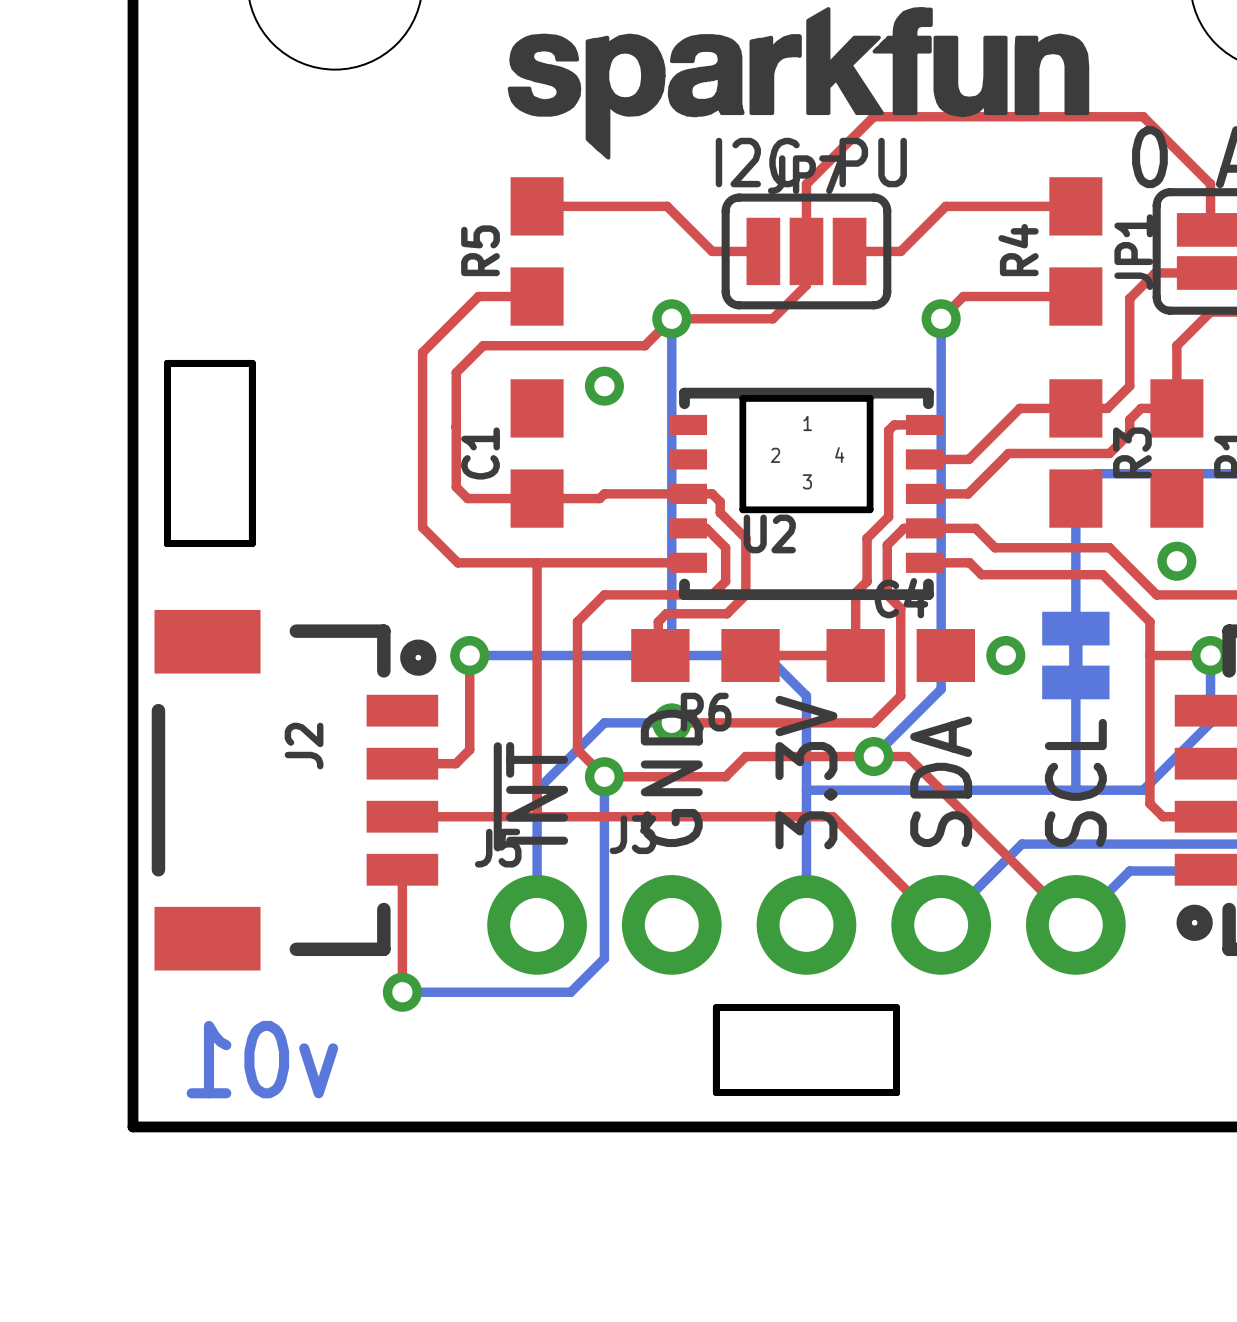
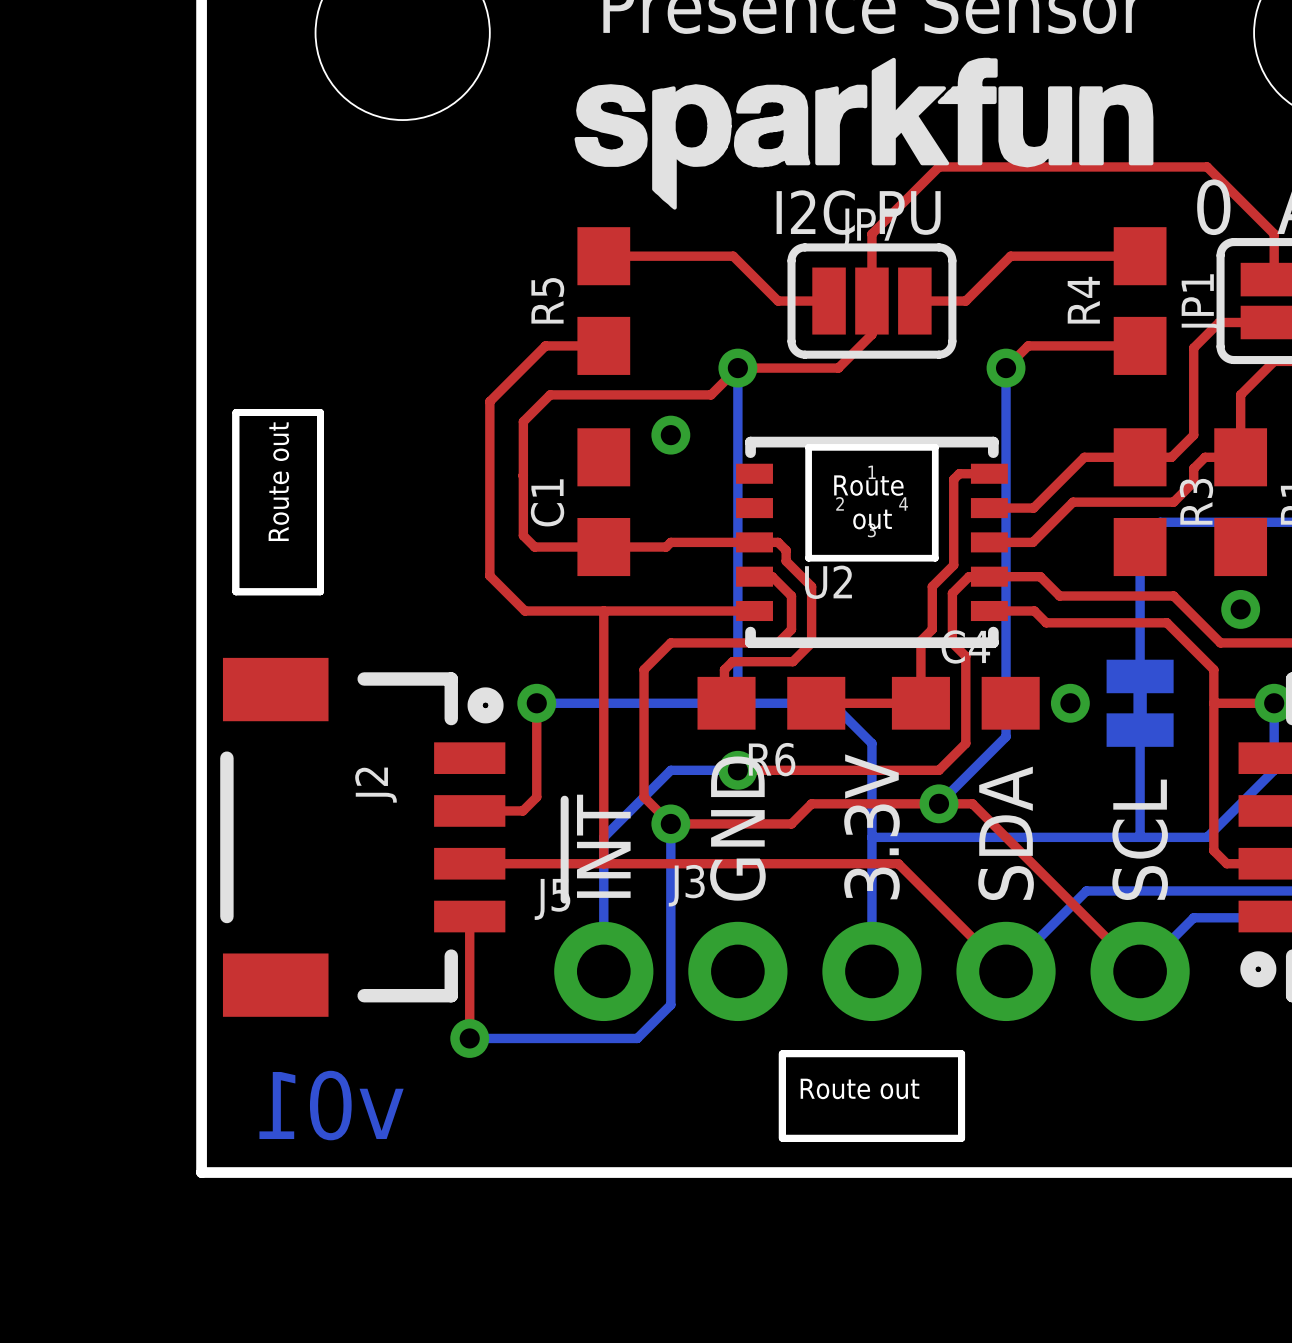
text: none -> Route (868, 485)
text: none -> Route out (278, 481)
text: none -> out (872, 519)
text: none -> Route out (860, 1088)

